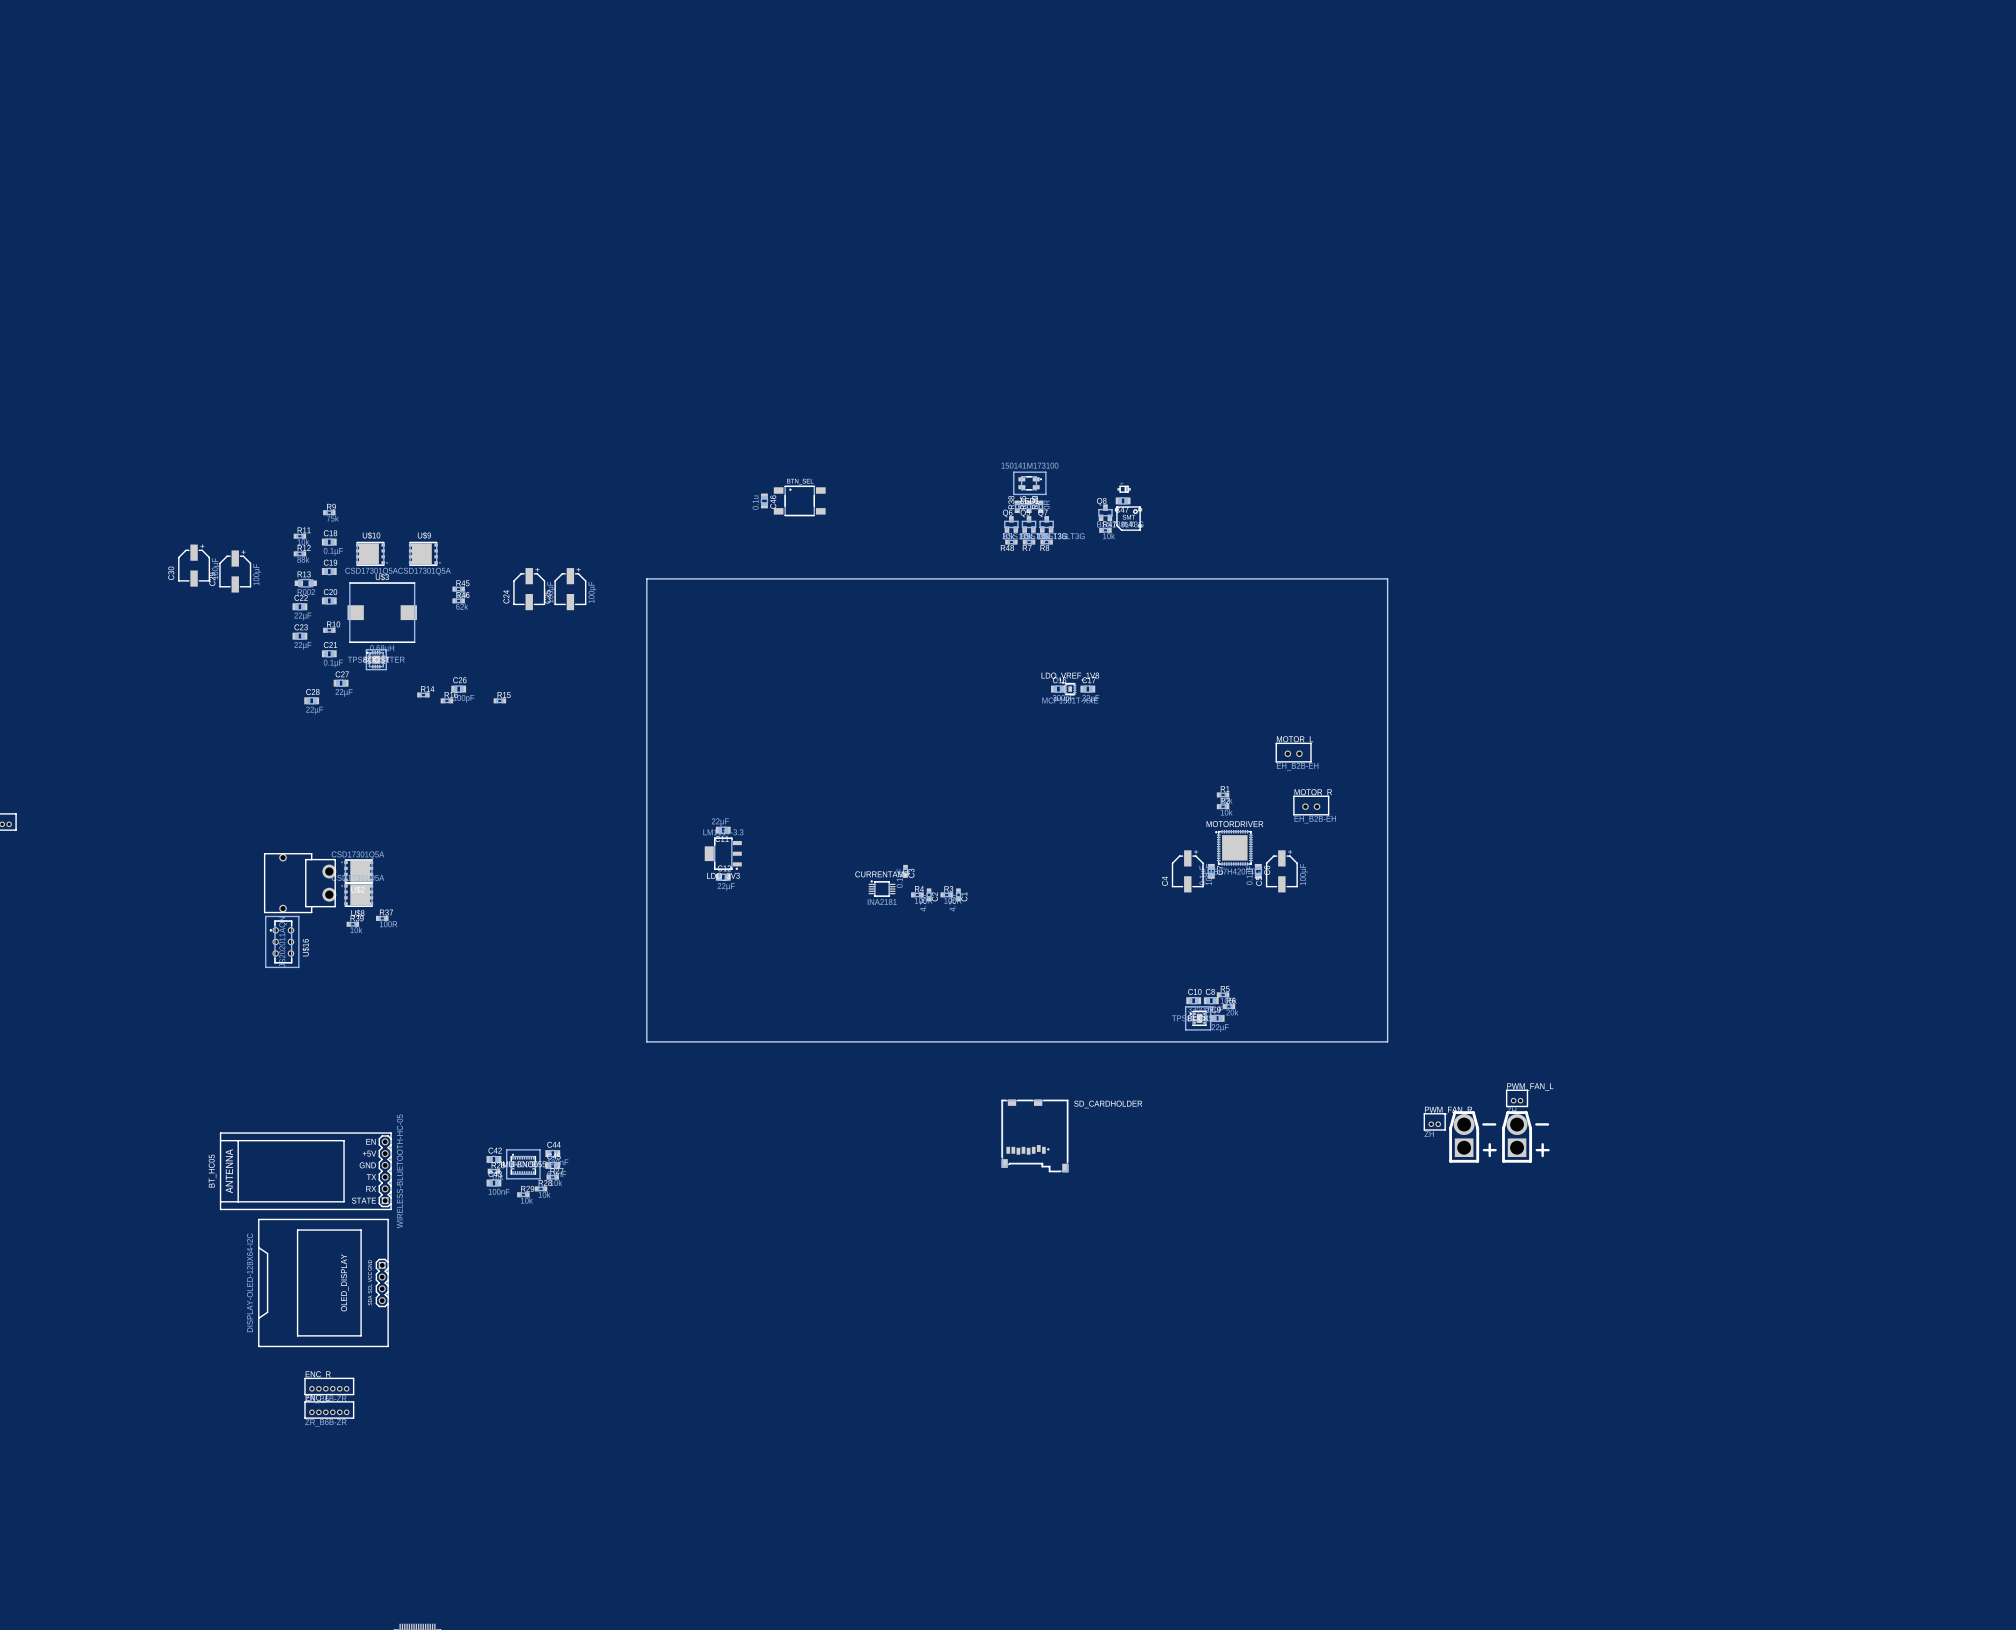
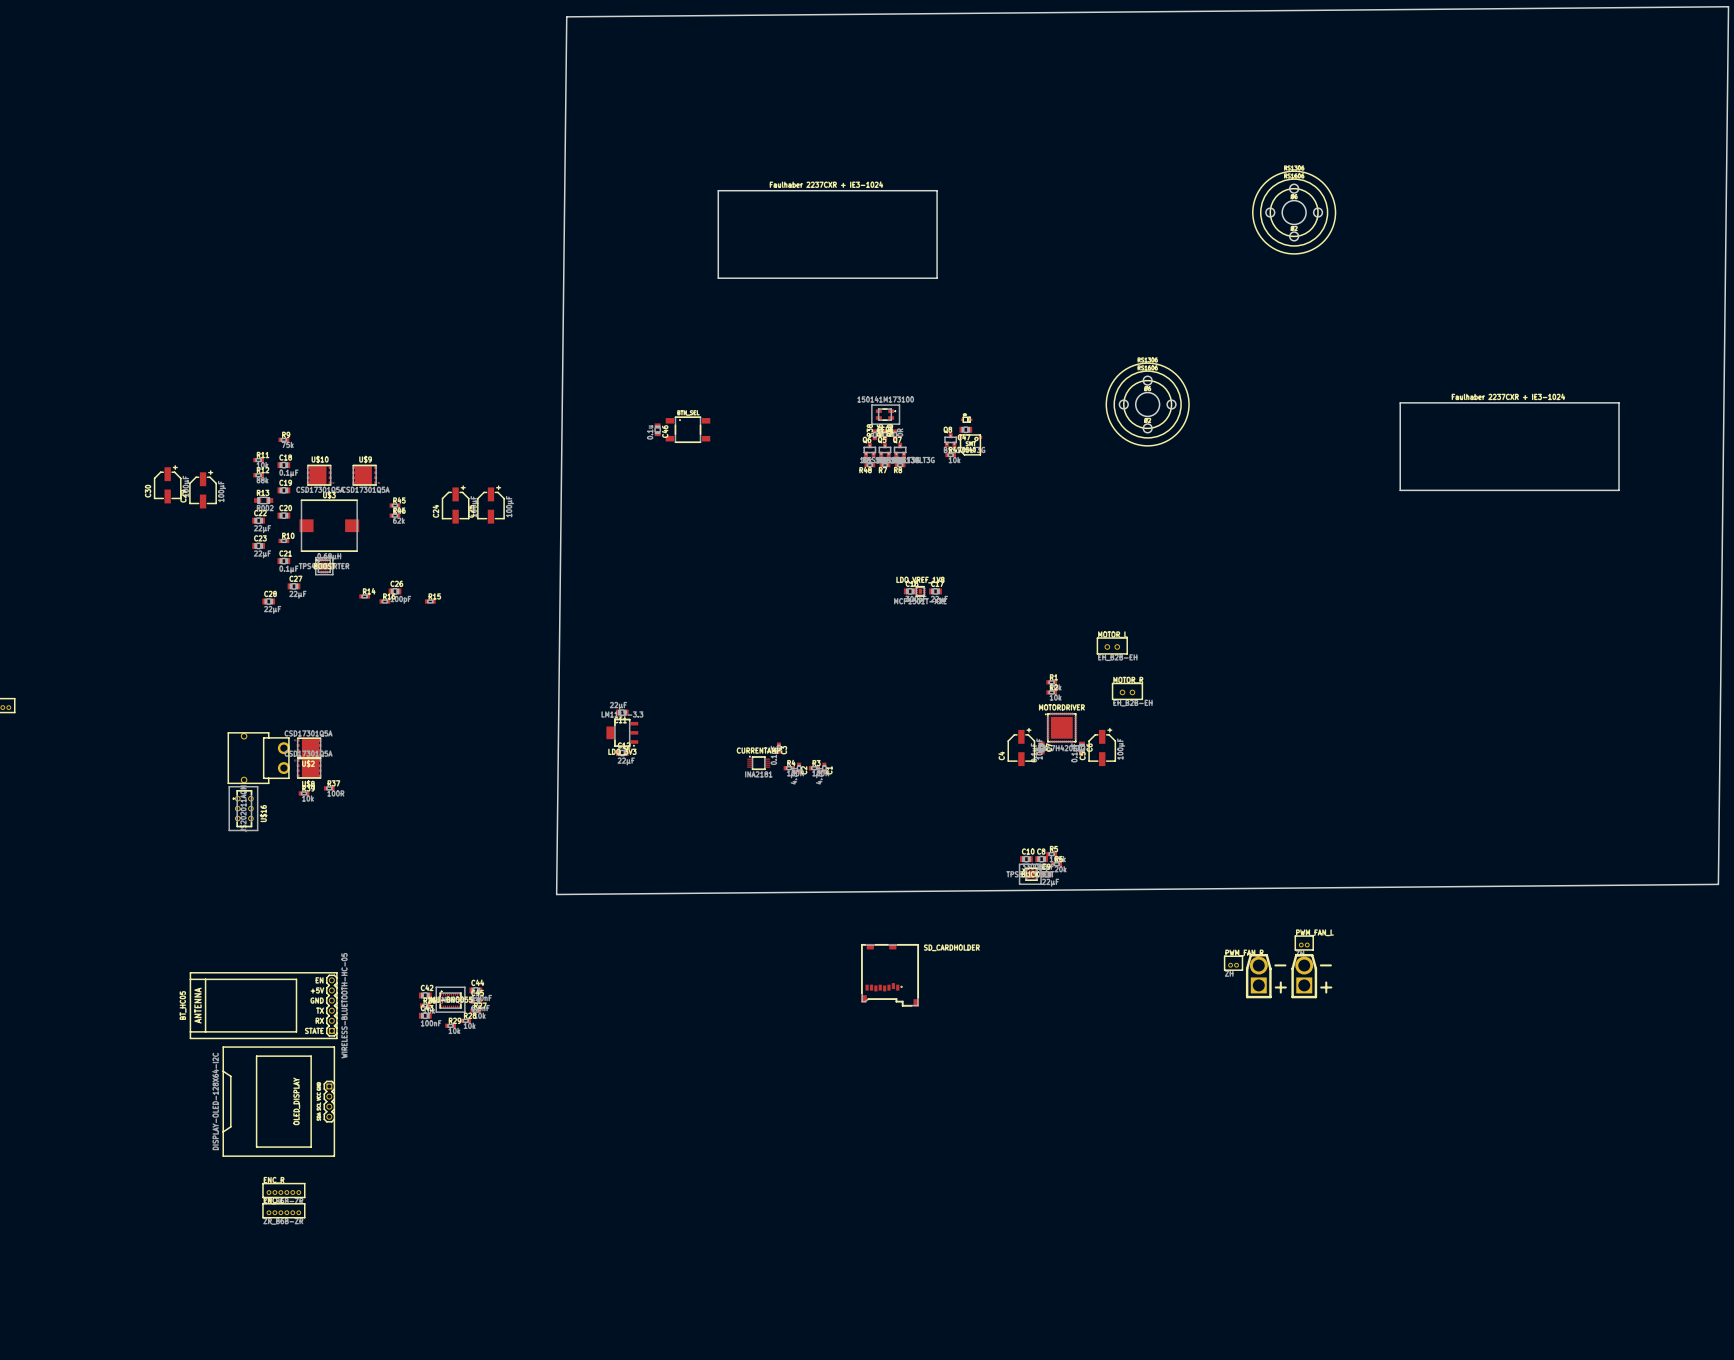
board edge: none -> (1728, 6) (1718, 884) (556, 894) (566, 16) (1728, 6)
drawing: none -> [1252, 170, 1336, 255]
drawing: none -> [718, 190, 938, 279]
drawing: none -> [1106, 362, 1190, 447]
drawing: none -> [1399, 402, 1620, 491]
board edge: (646, 578) (1387, 578) (1387, 1041) (646, 1041) (646, 578) -> none

